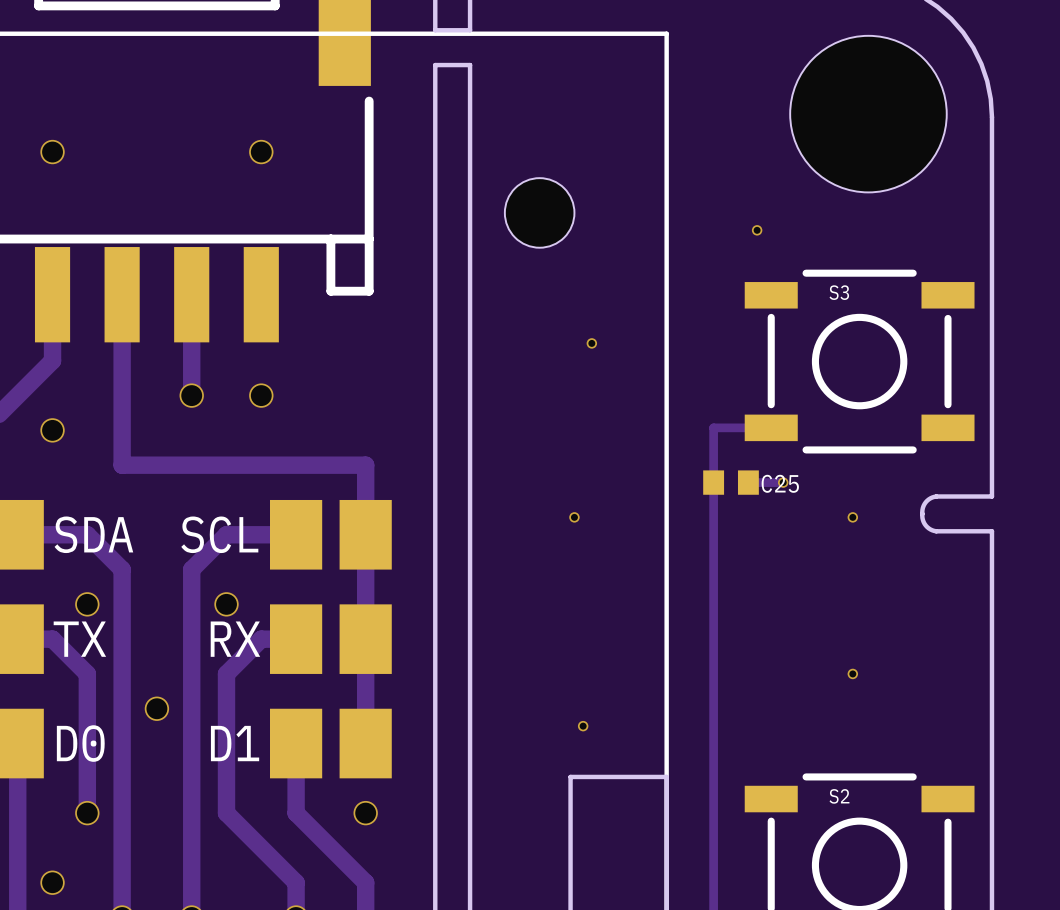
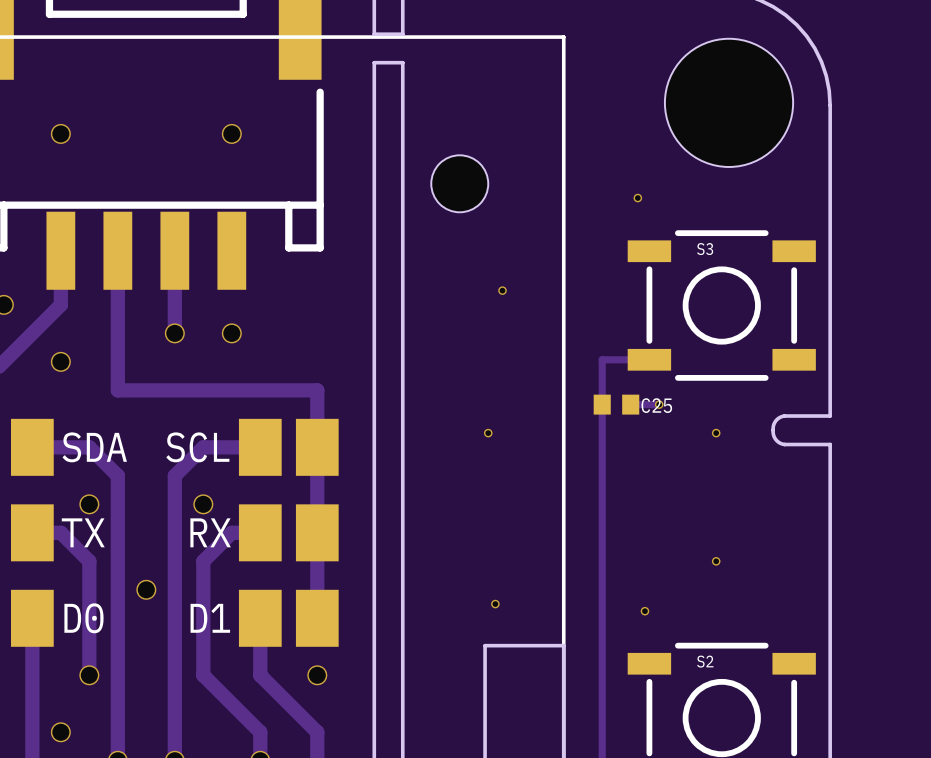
via: none -> (644, 611)

